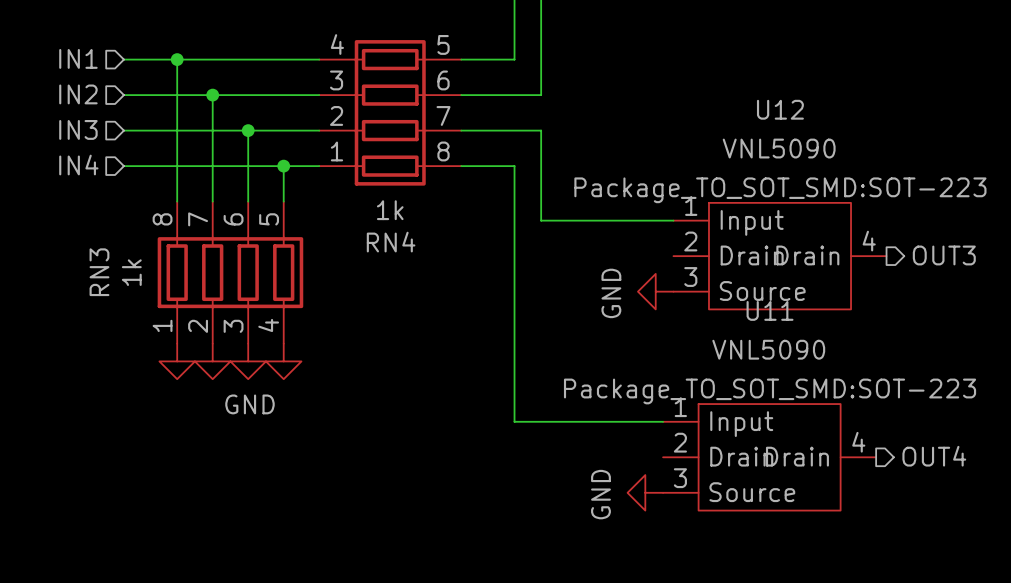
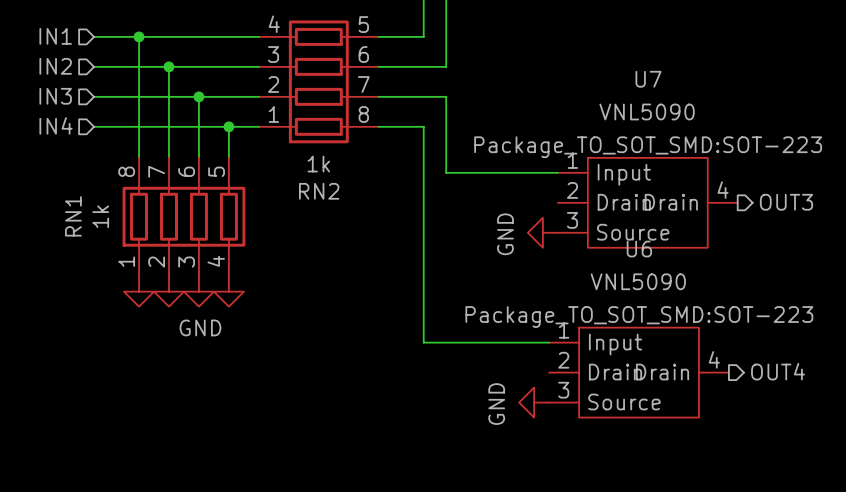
U12 name: U12 (780, 109) -> U7 (648, 79)
RN4 name: RN4 (391, 242) -> RN2 (319, 191)
RN3 name: RN3 (99, 272) -> RN1 (73, 216)
U11 name: U11 (770, 310) -> U6 (639, 249)

